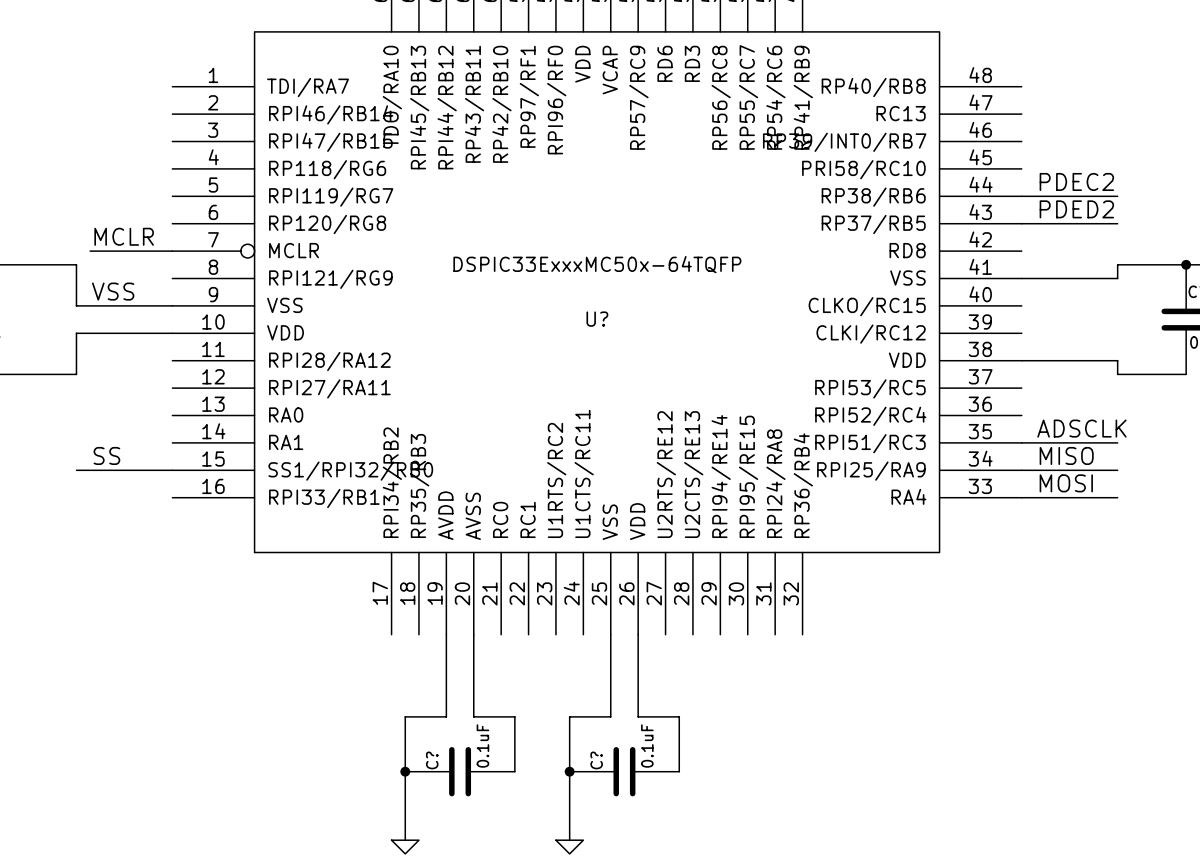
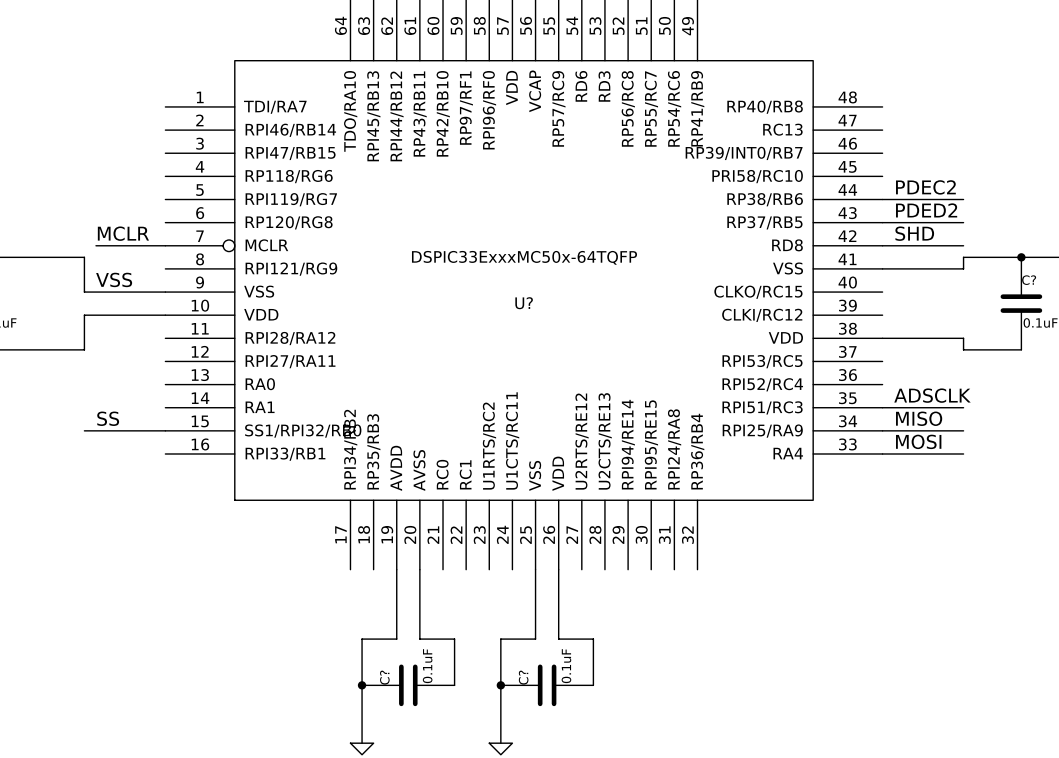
label: none -> SHD (914, 233)
wire: none -> (882, 245) (963, 245)

